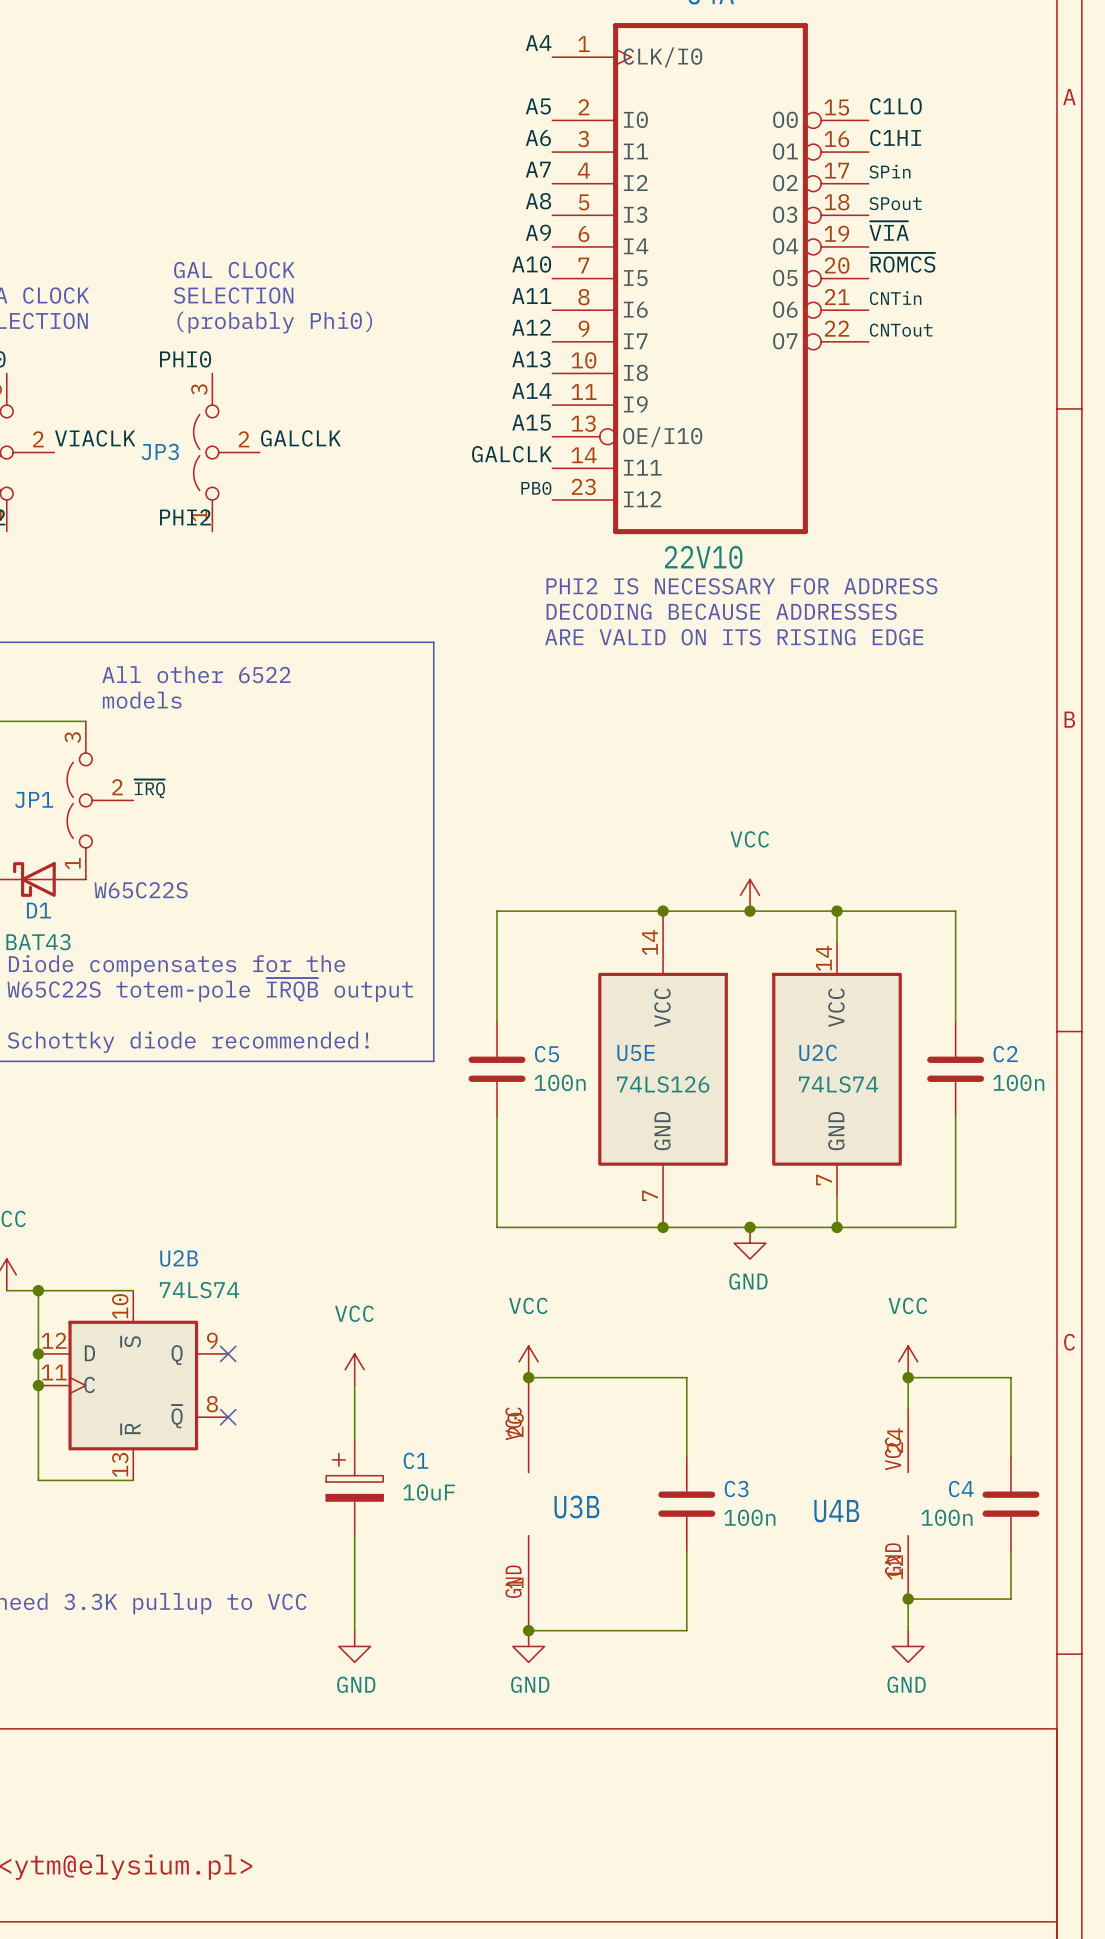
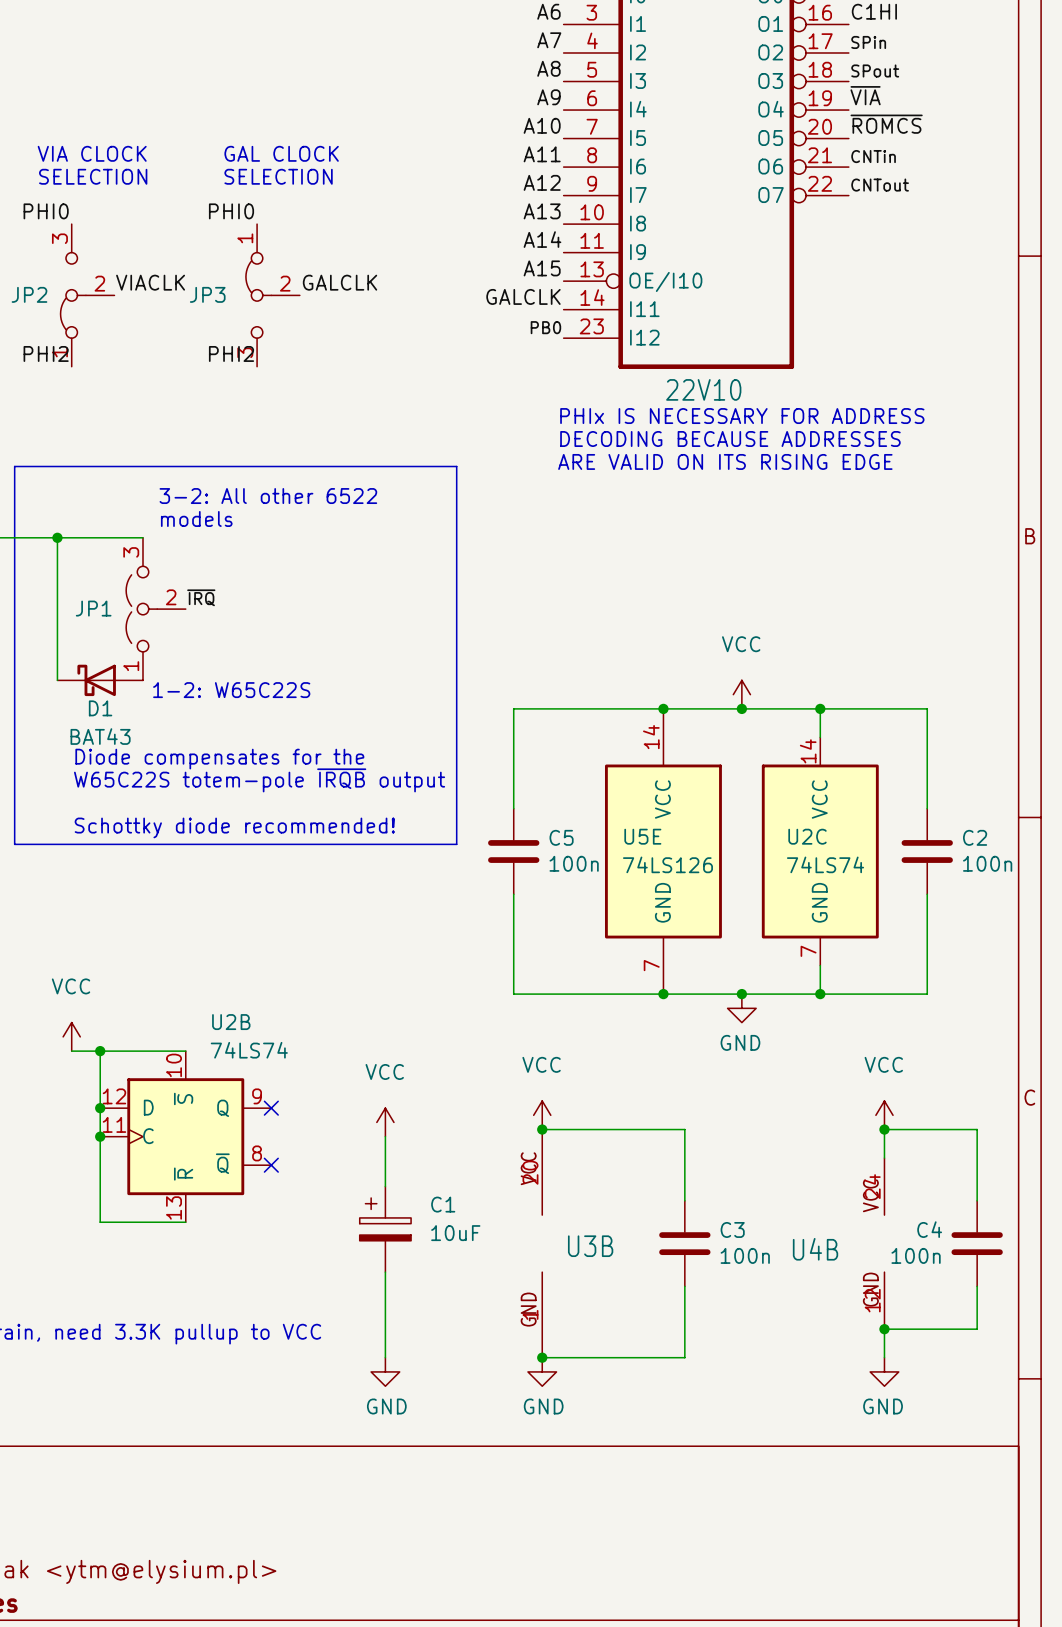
text: GAL CLOCK (234, 270) -> none
text: SELECTION (233, 295) -> GAL CLOCK (281, 153)
text: (probably Phi0) (274, 322) -> SELECTION (278, 176)
JP3 symbol: [193, 373, 260, 532] -> [245, 224, 300, 367]
text: PHI2 IS NECESSARY FOR ADDRESS (741, 586) -> PHIx IS NECESSARY FOR ADDRESS (742, 416)
text: All other 6522 (196, 674) -> 3-2: All other 6522 (268, 496)
text: W65C22S (141, 890) -> 1-2: W65C22S (231, 690)

